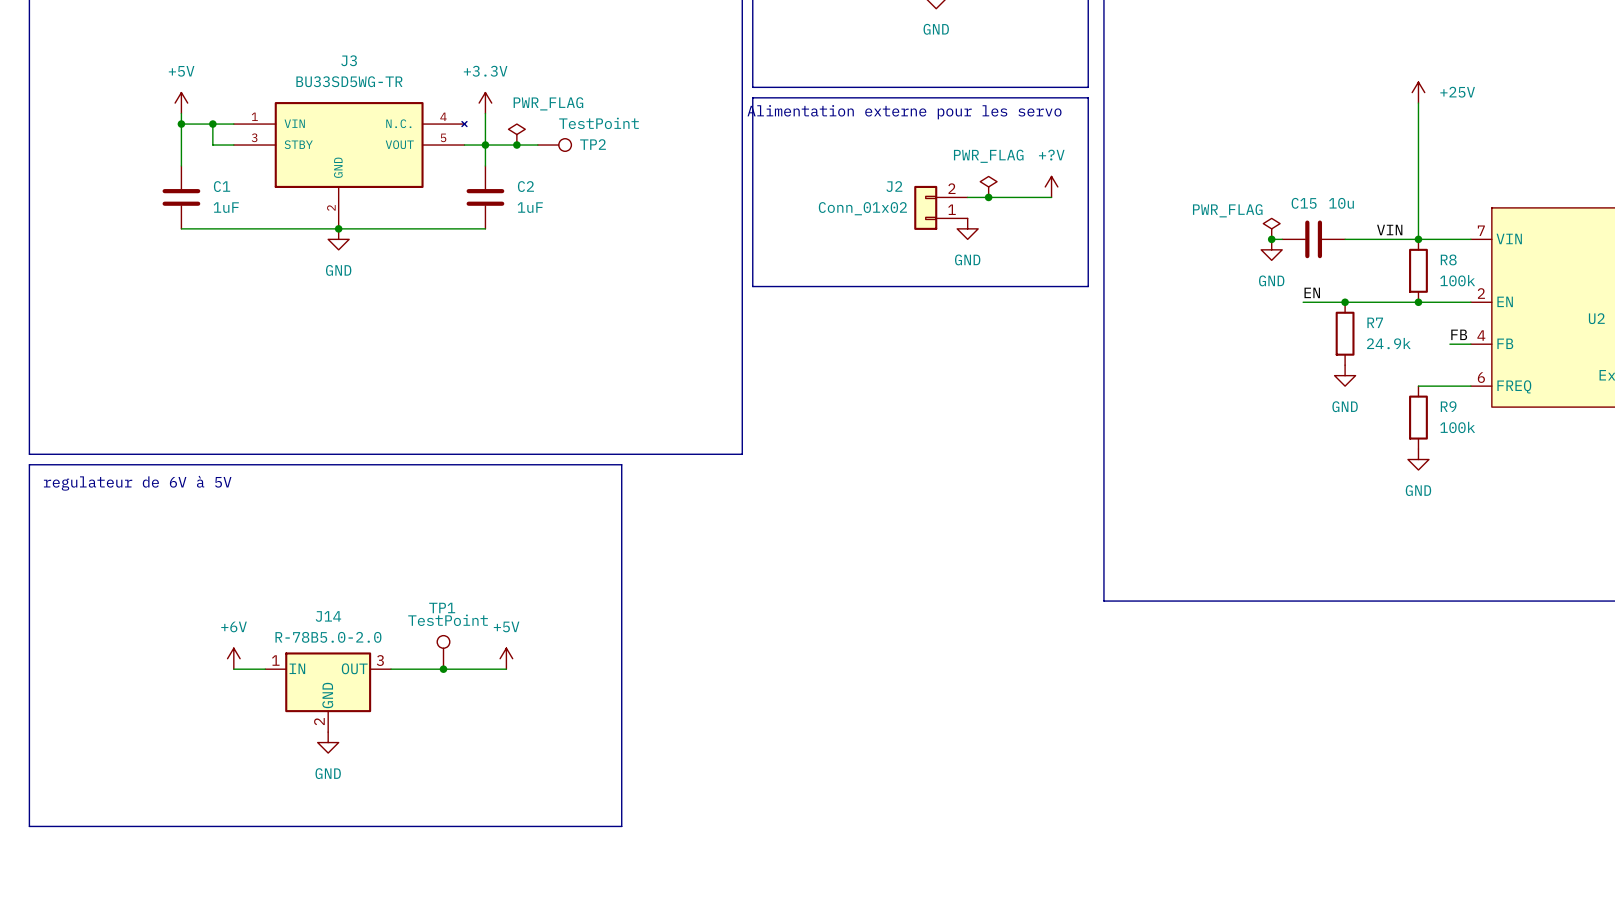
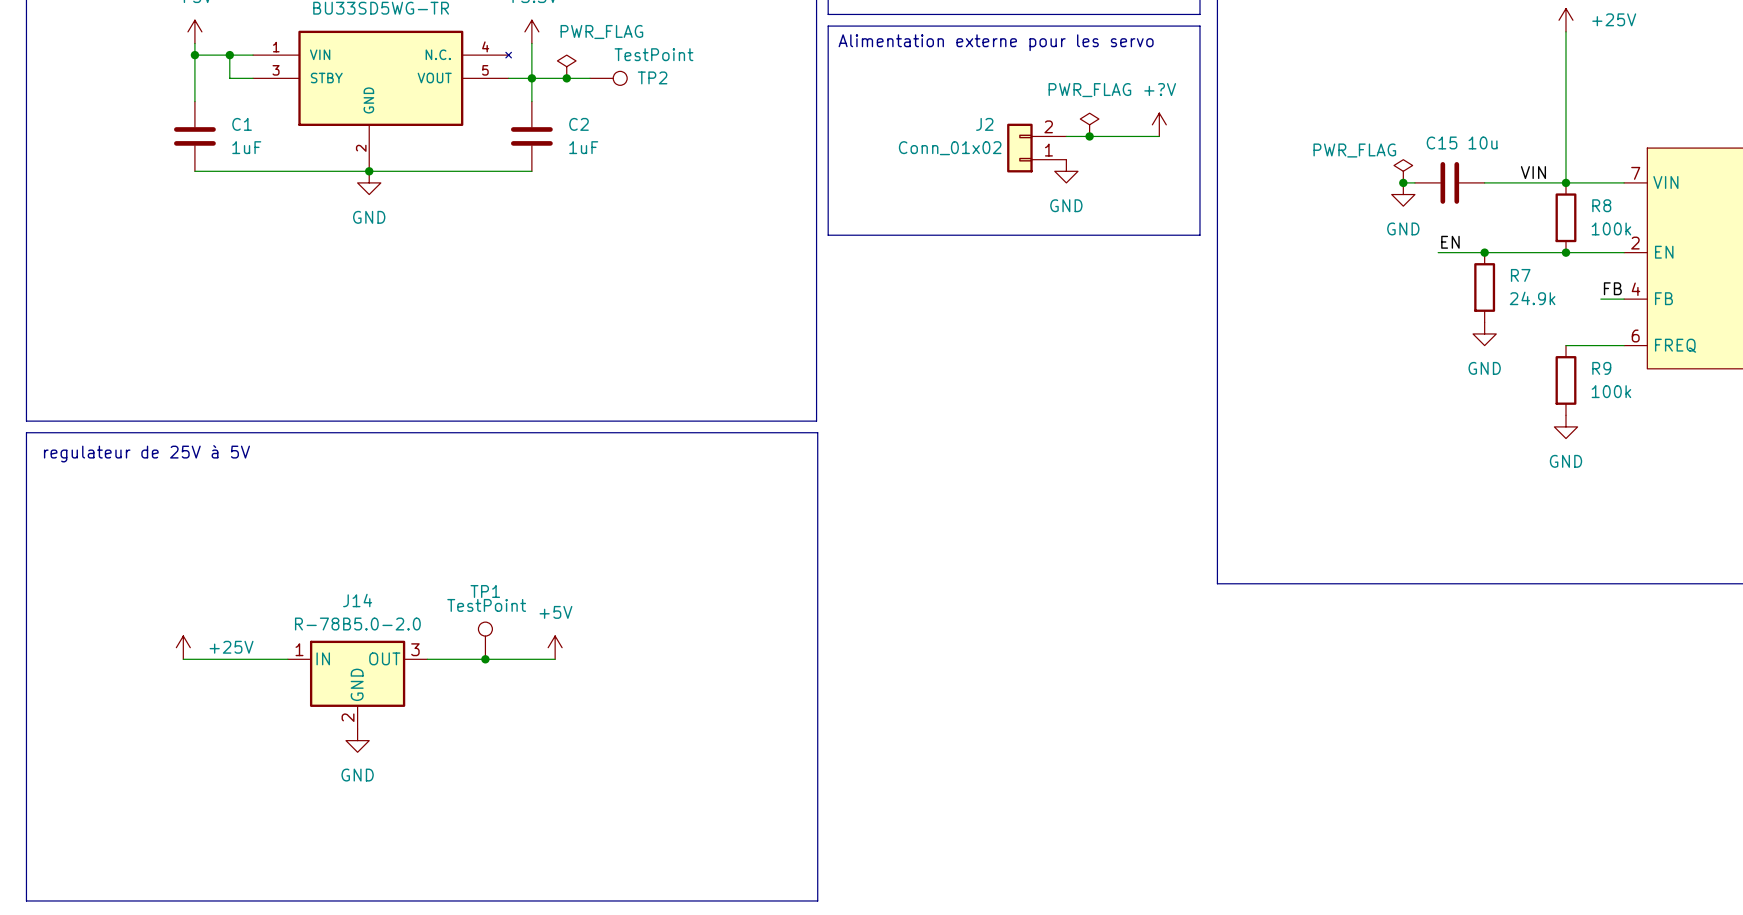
line: (621, 464) (621, 826) (29, 826) -> (682, 432) (817, 432) (817, 900) (26, 900) (26, 833)
text: regulateur de 6V à 5V (137, 483) -> regulateur de 25V à 5V (146, 453)
power symbol: none -> +25V (183, 647)
power symbol: +6V (233, 658) -> none
wire: none -> (183, 659) (253, 659)

